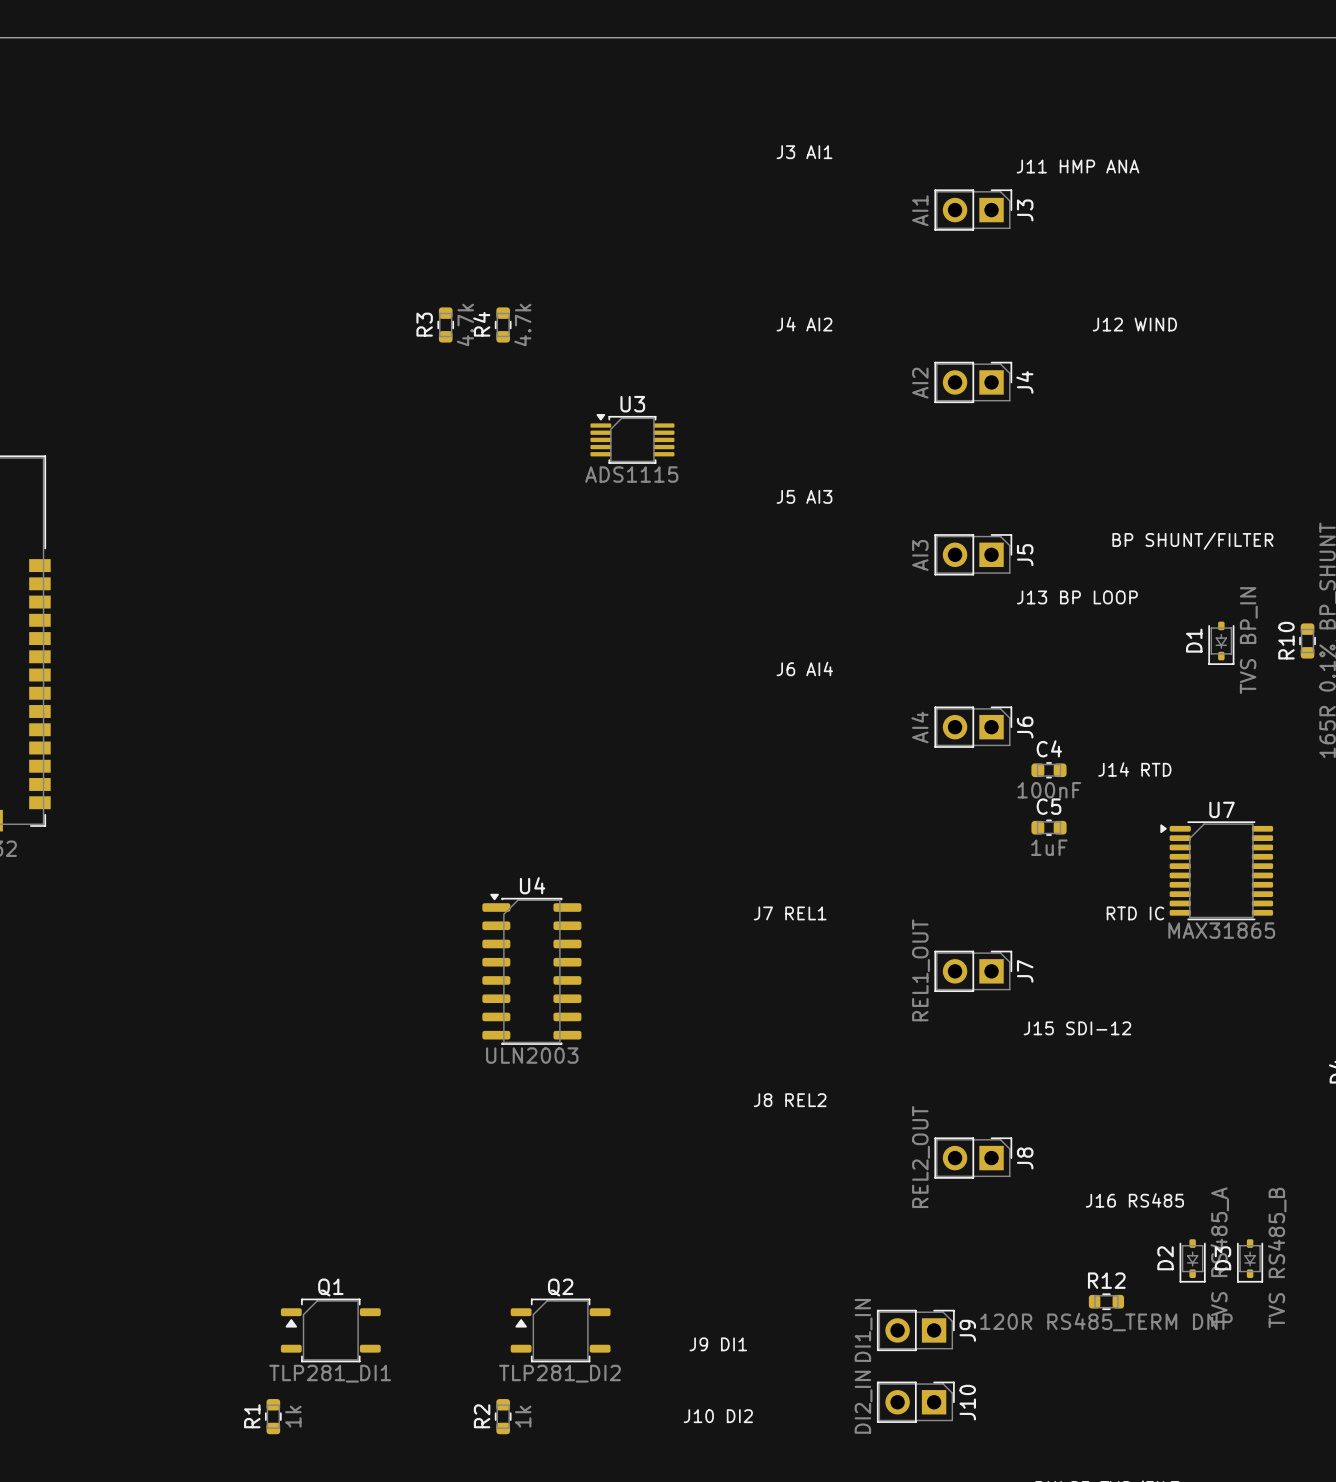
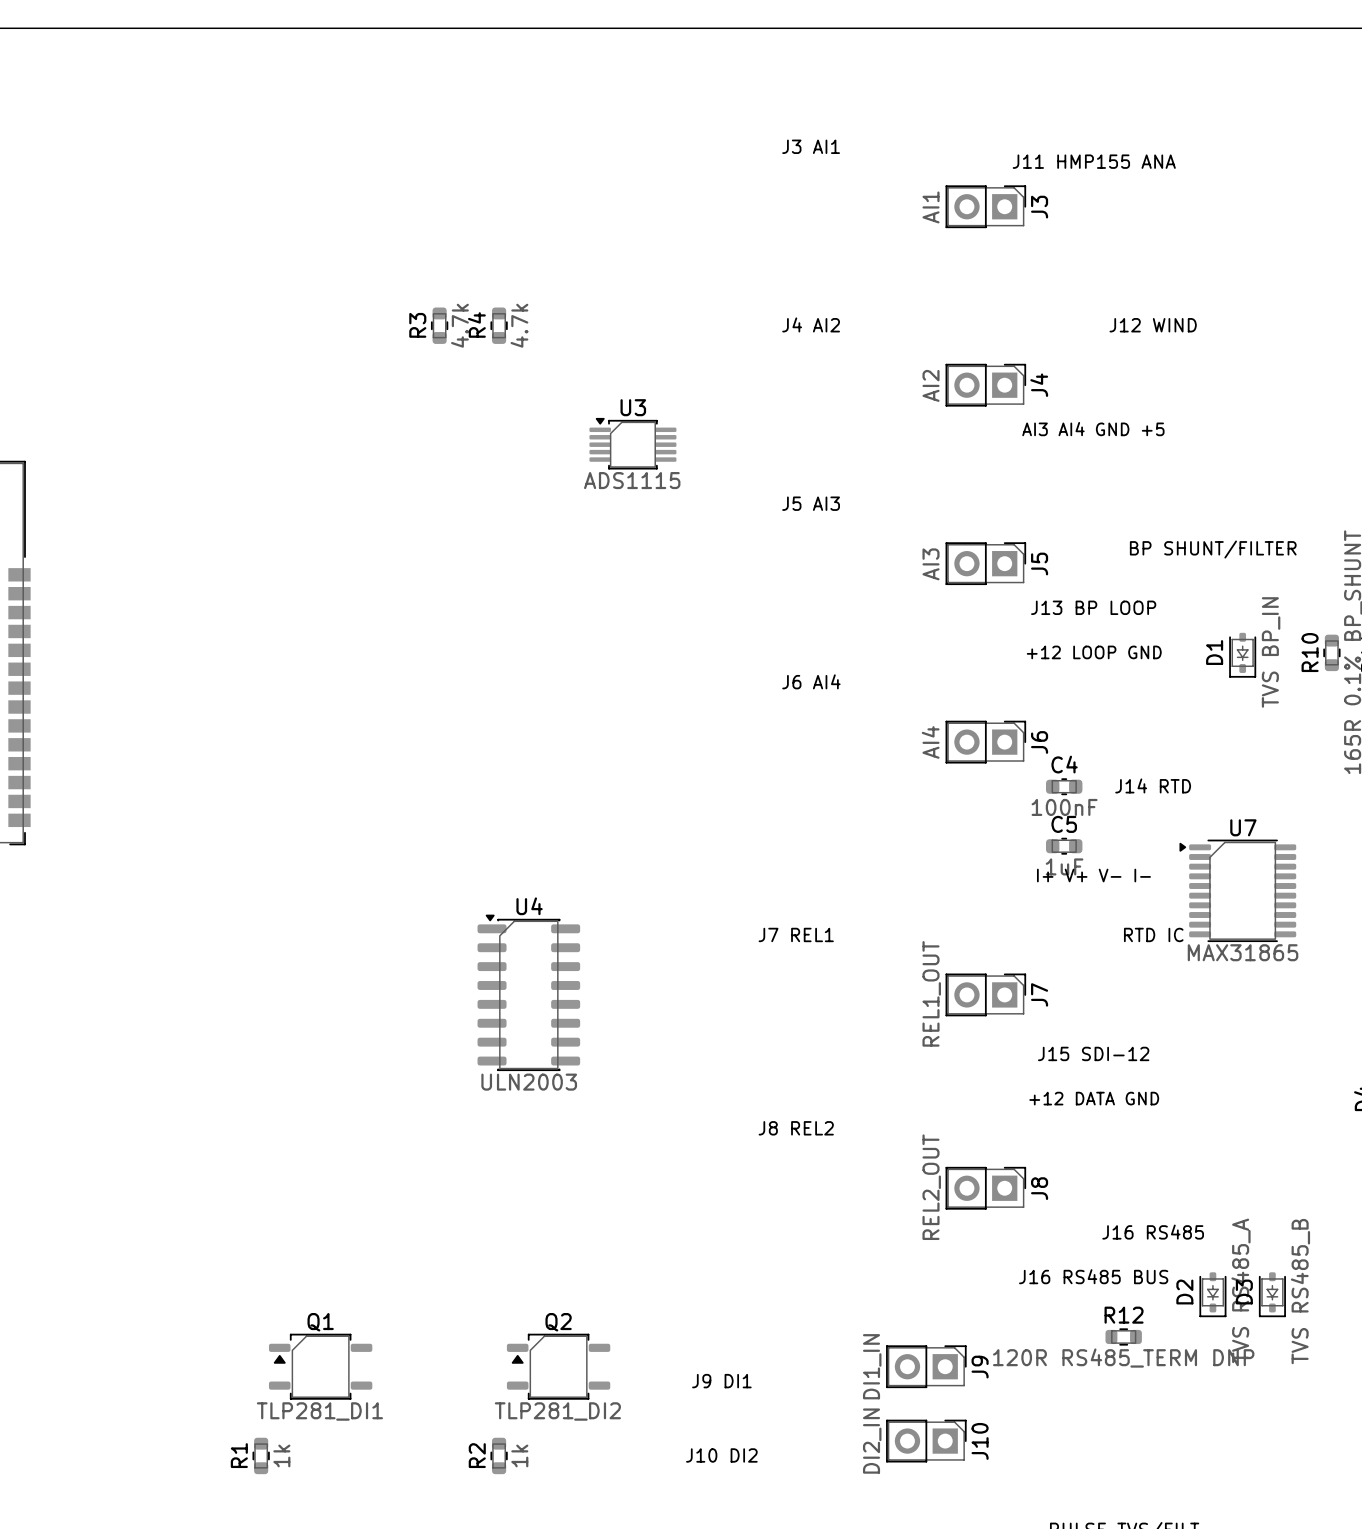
text: J11 HMP ANA (1078, 166) -> J11 HMP155 ANA (1094, 161)
text: none -> AI3 AI4 GND +5 (1093, 429)
text: none -> +12 LOOP GND (1094, 652)
text: none -> I+ V+ V- I- (1093, 875)
text: none -> +12 DATA GND (1094, 1098)
text: none -> J16 RS485 BUS (1093, 1276)

